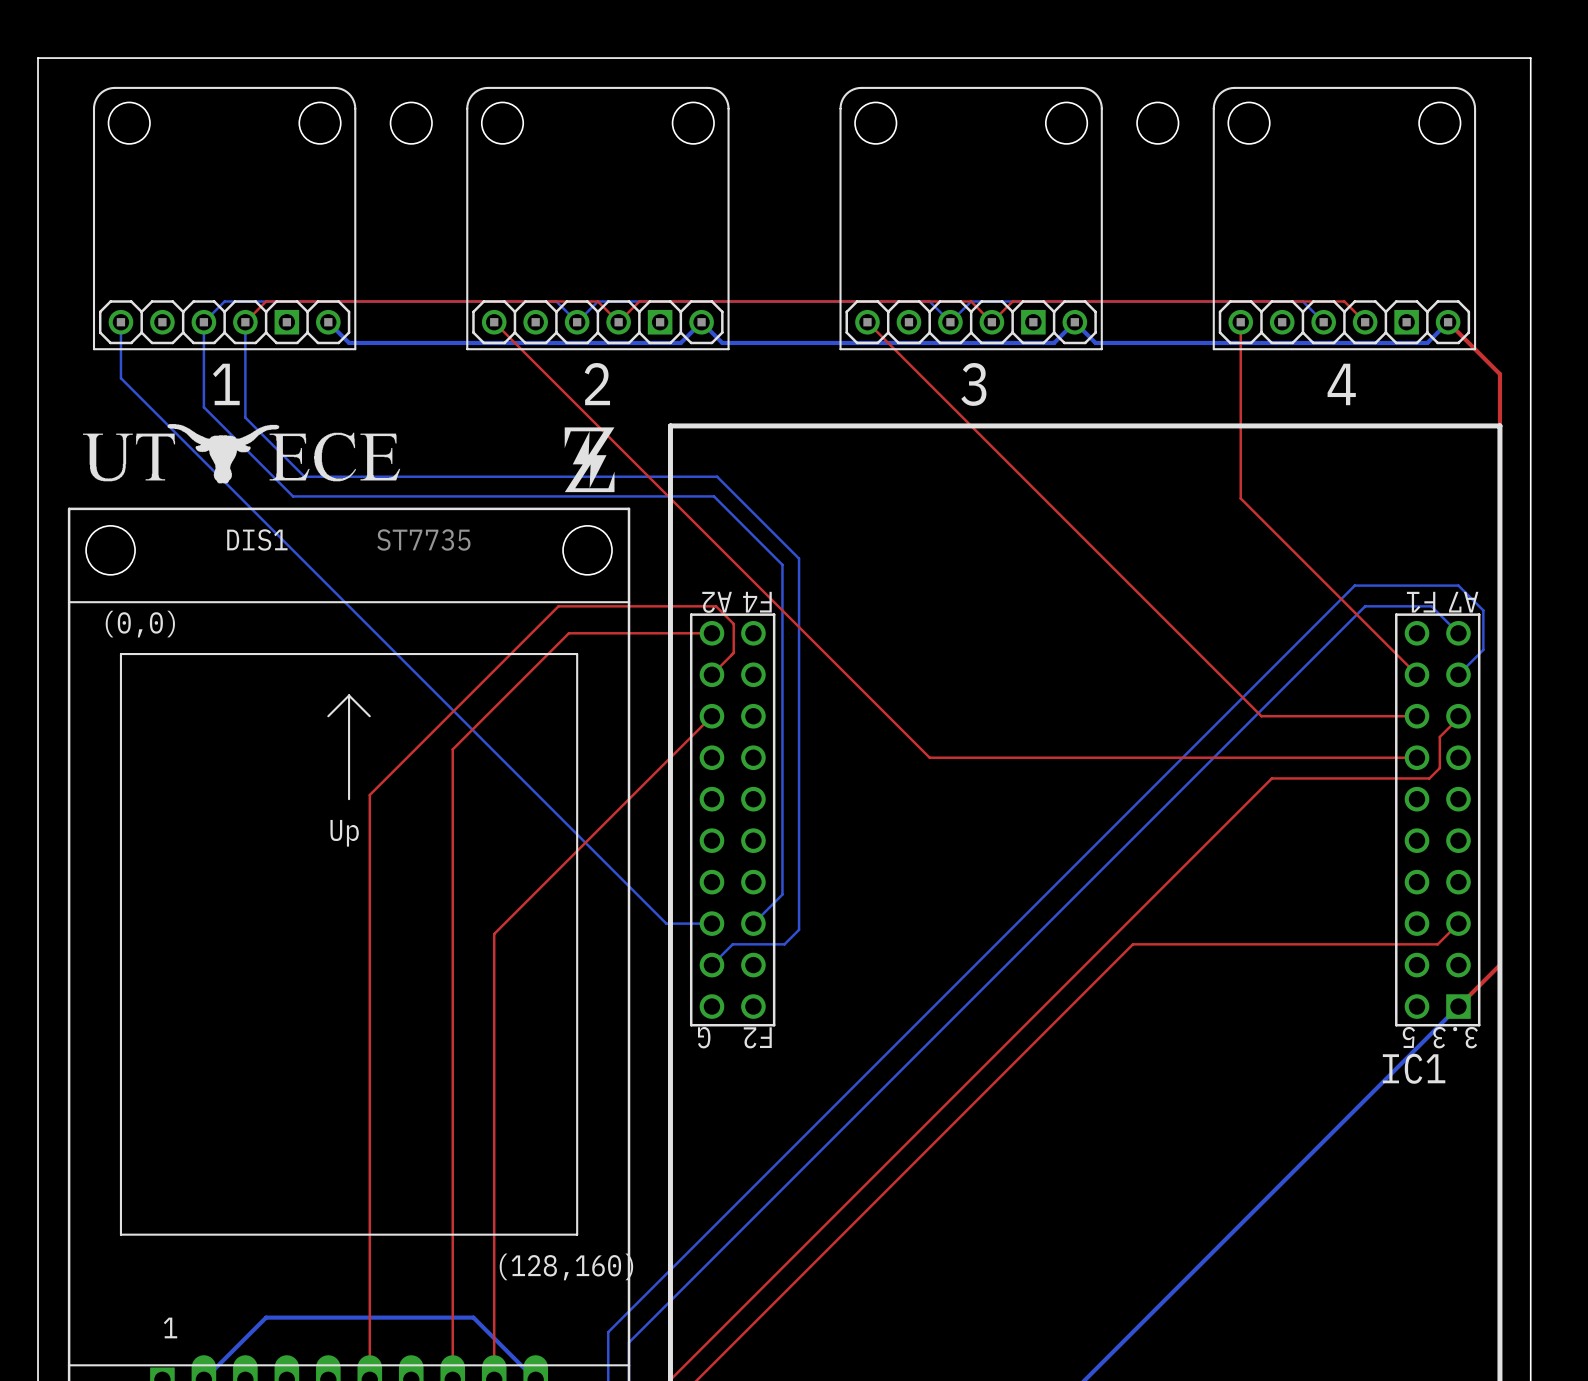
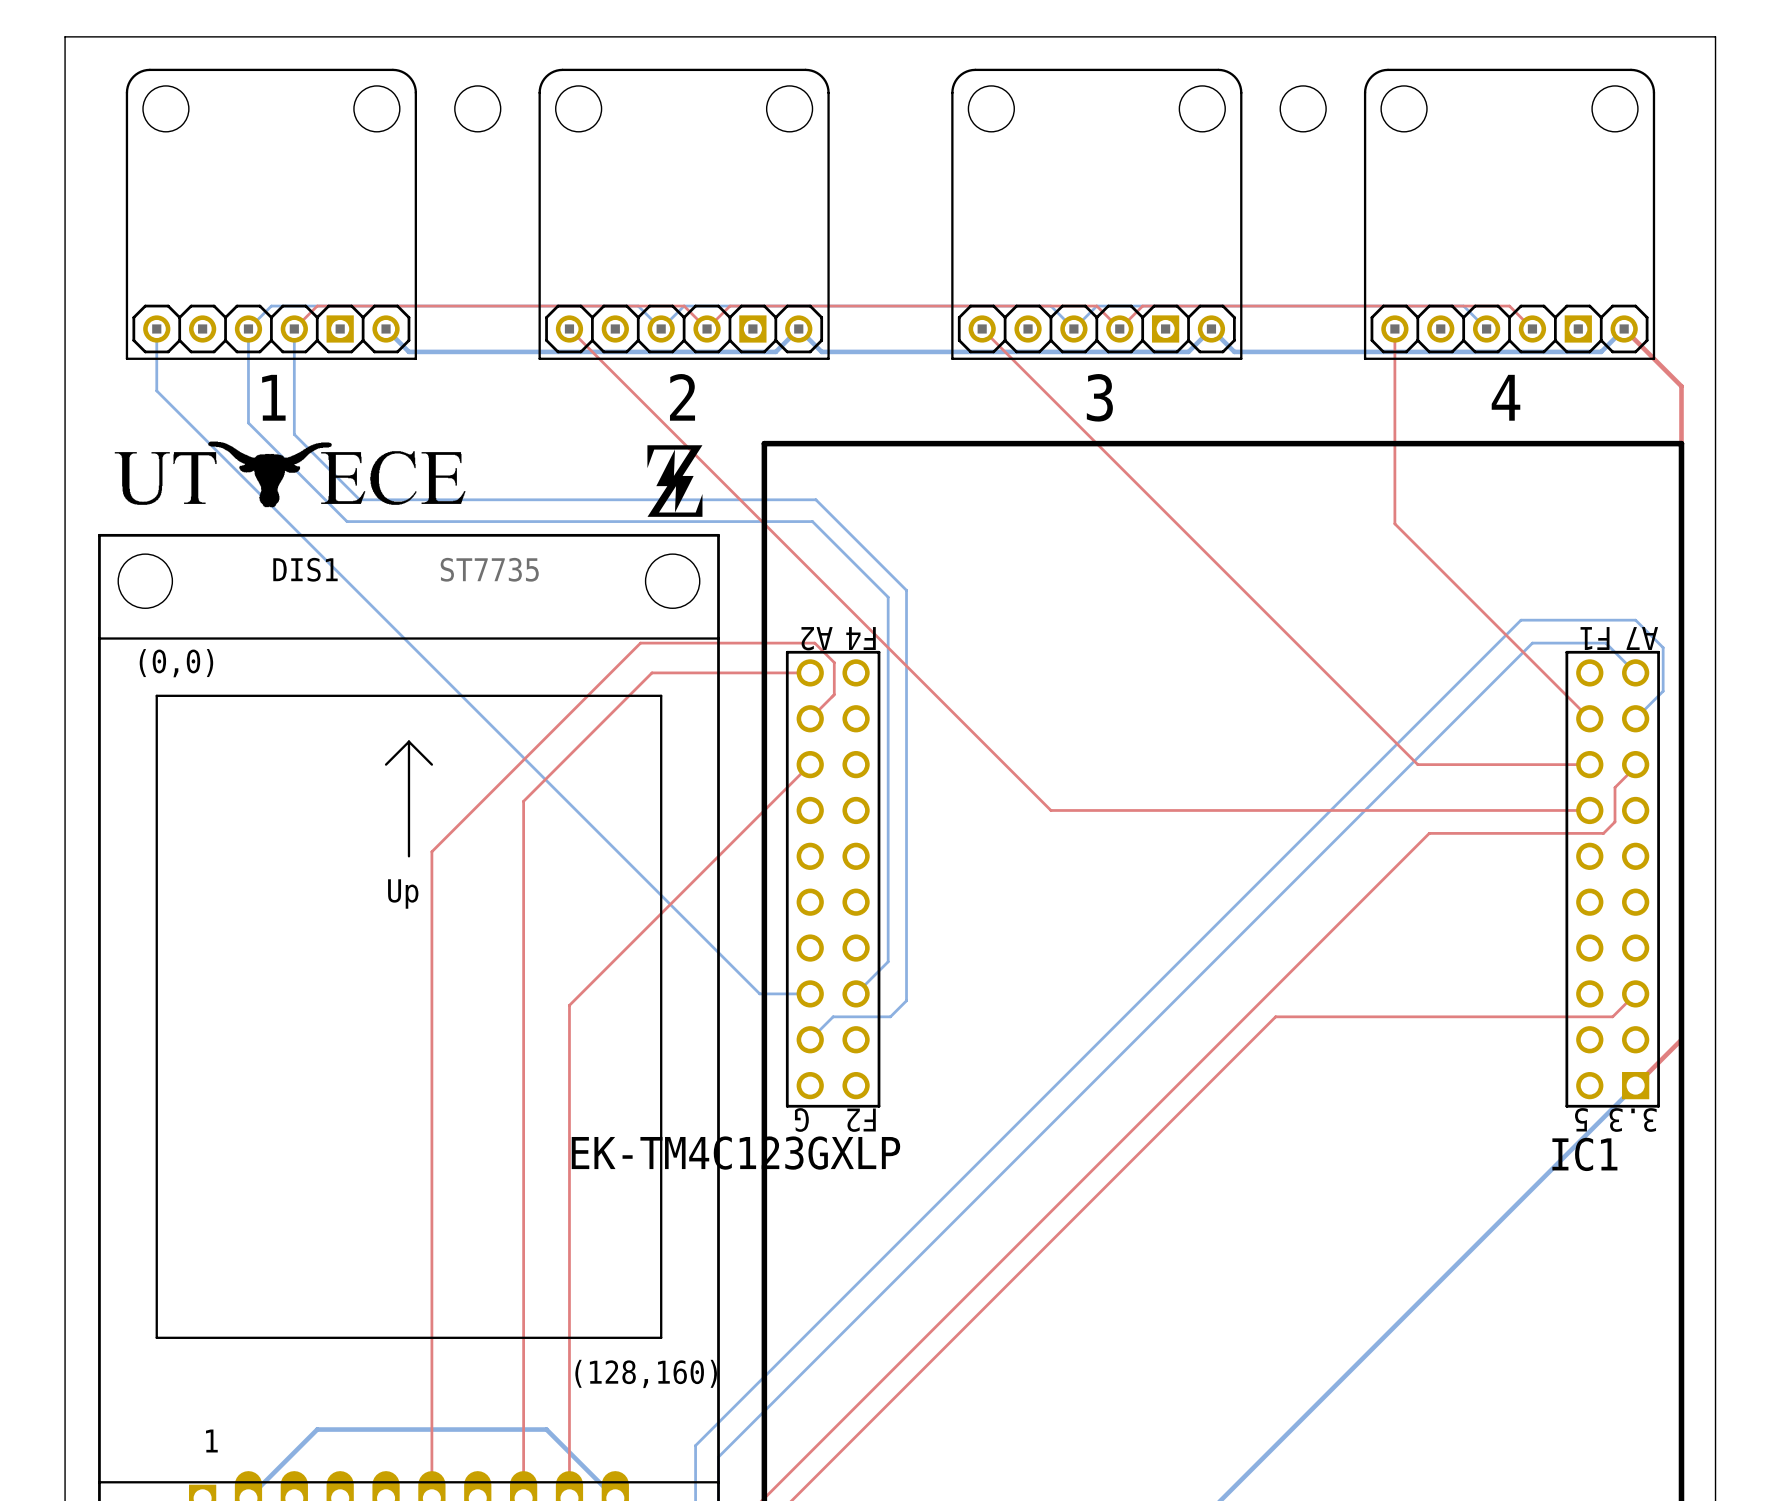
IC1 value: none -> EK-TM4C123GXLP (735, 1153)

